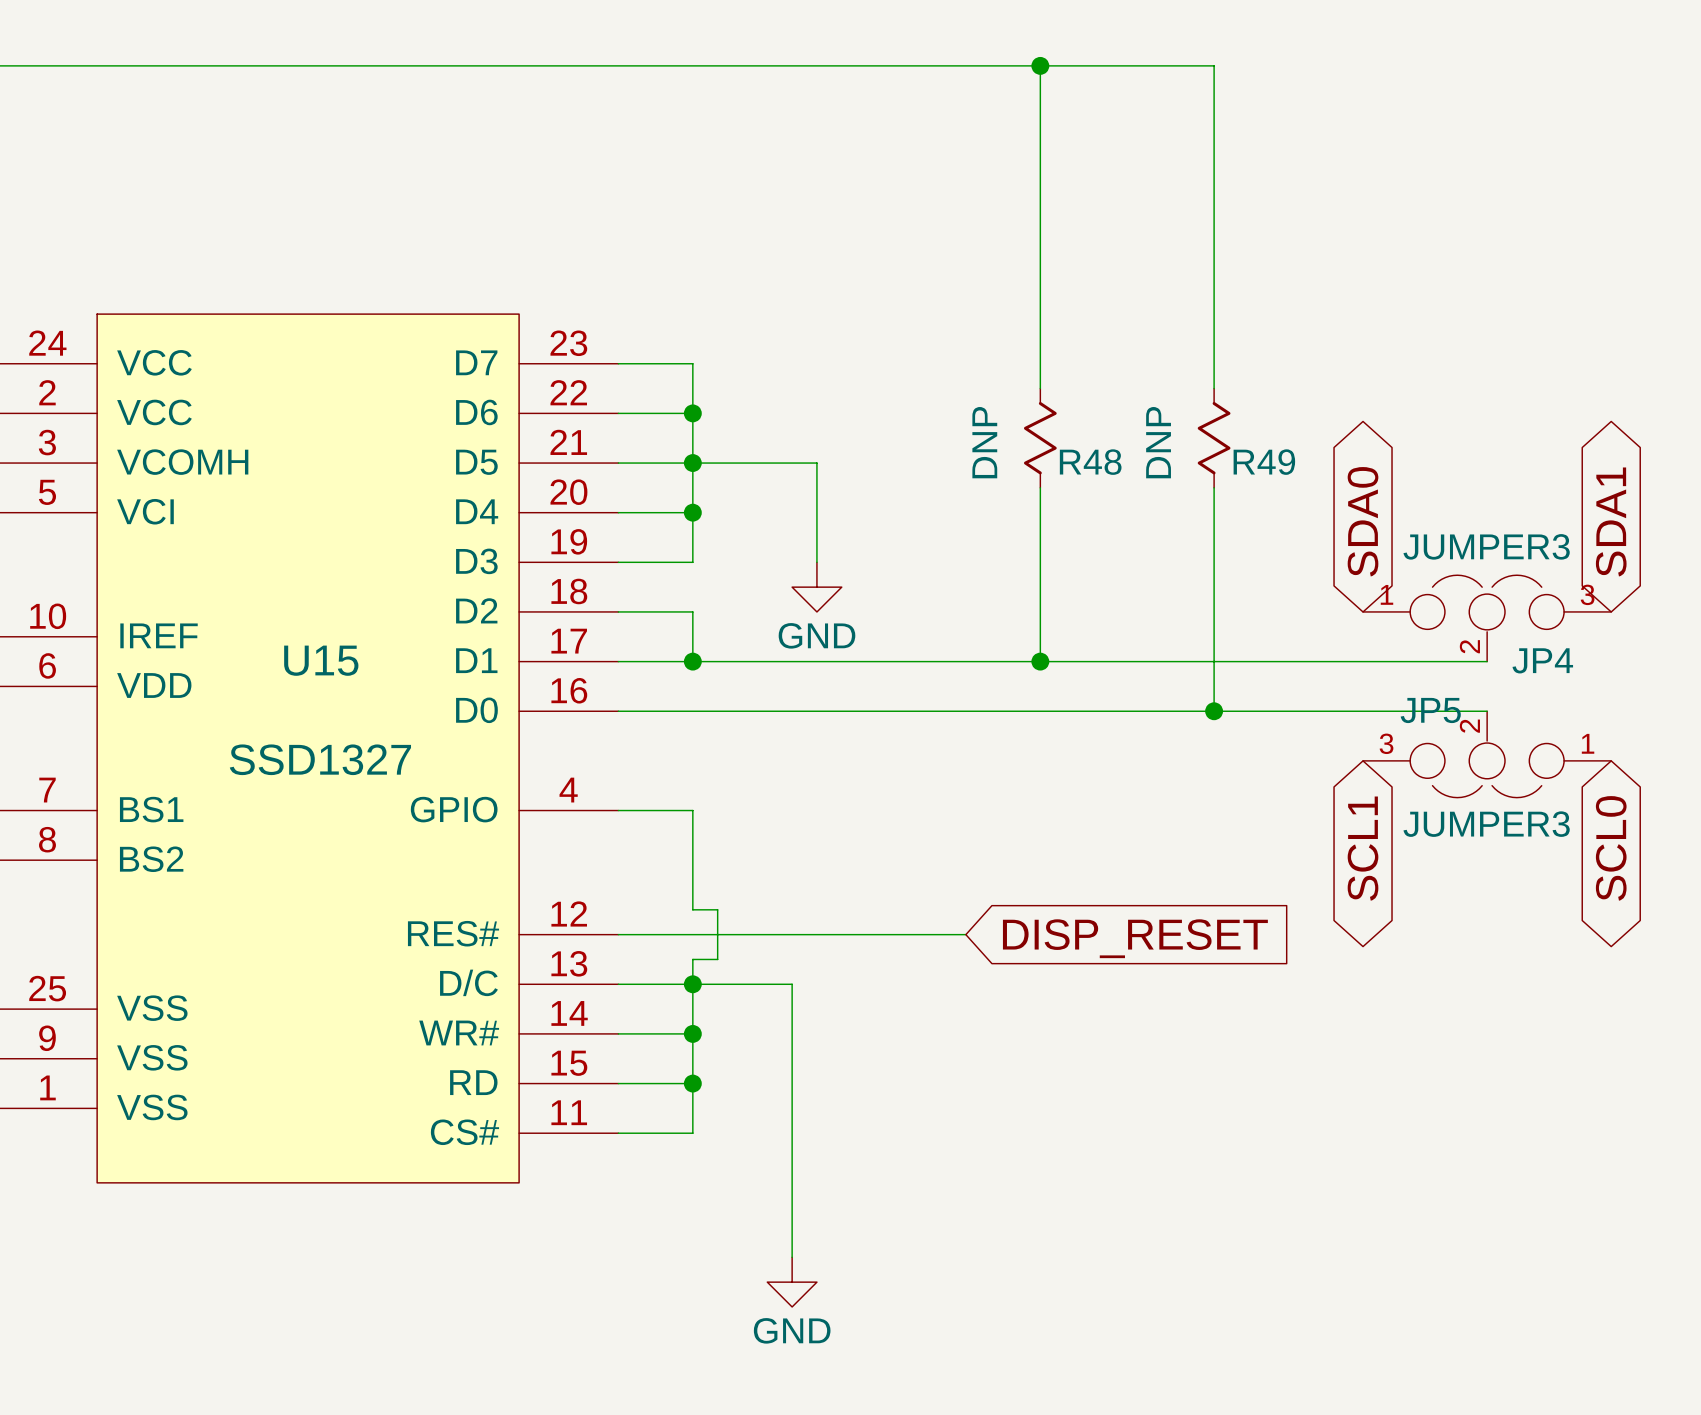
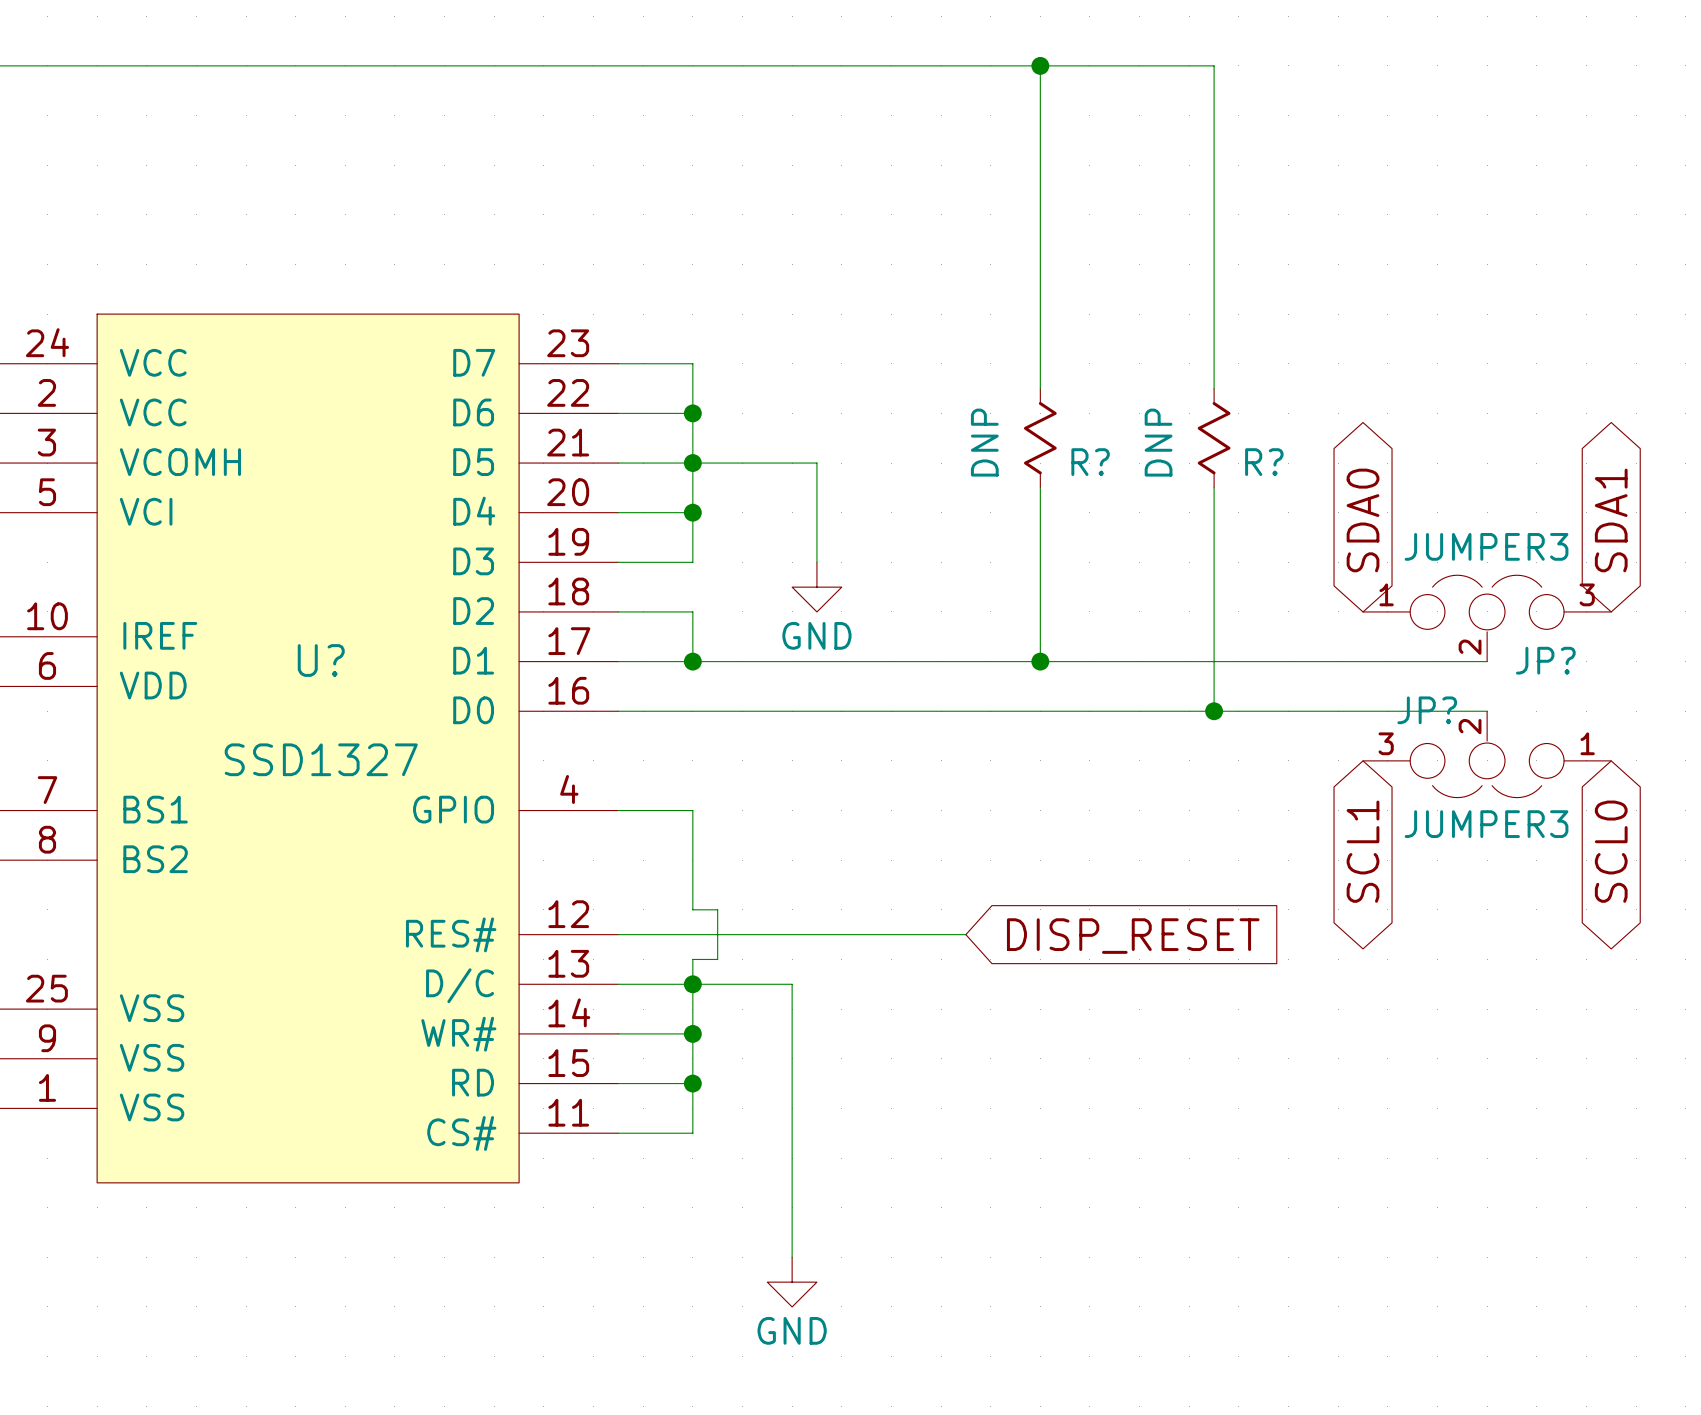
R48 name: R48 (1090, 462) -> R? (1090, 462)
R49 name: R49 (1264, 462) -> R? (1264, 462)
U15 name: U15 (321, 660) -> U? (321, 660)
JP4 name: JP4 (1542, 660) -> JP? (1545, 660)
JP5 name: JP5 (1430, 710) -> JP? (1427, 710)

